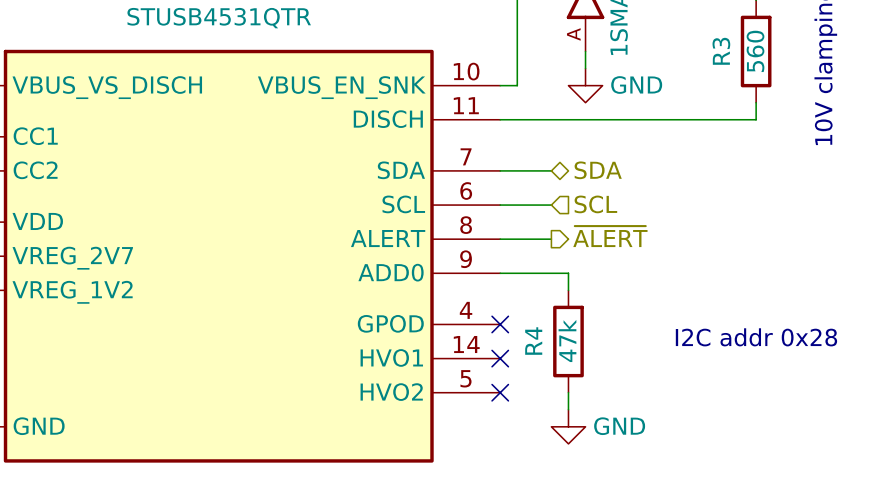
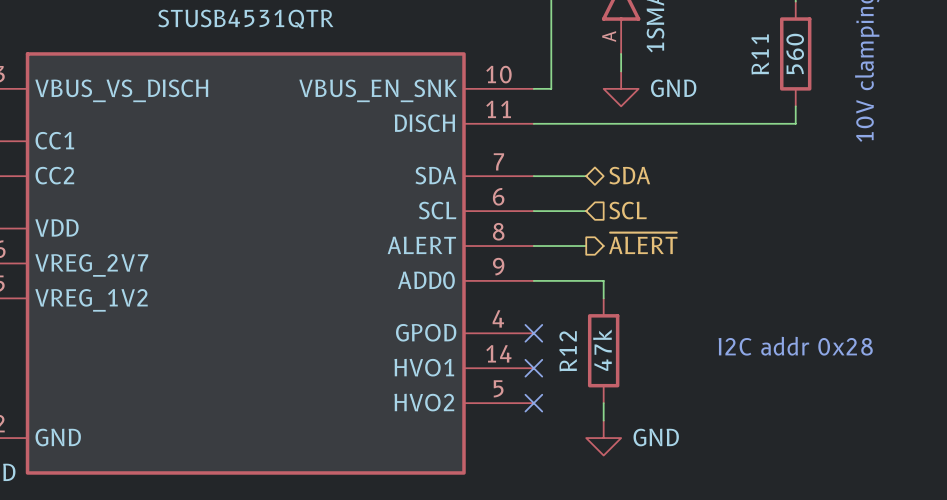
R3 name: R3 (721, 51) -> R11 (760, 54)
R4 name: R4 (533, 341) -> R12 (568, 351)

